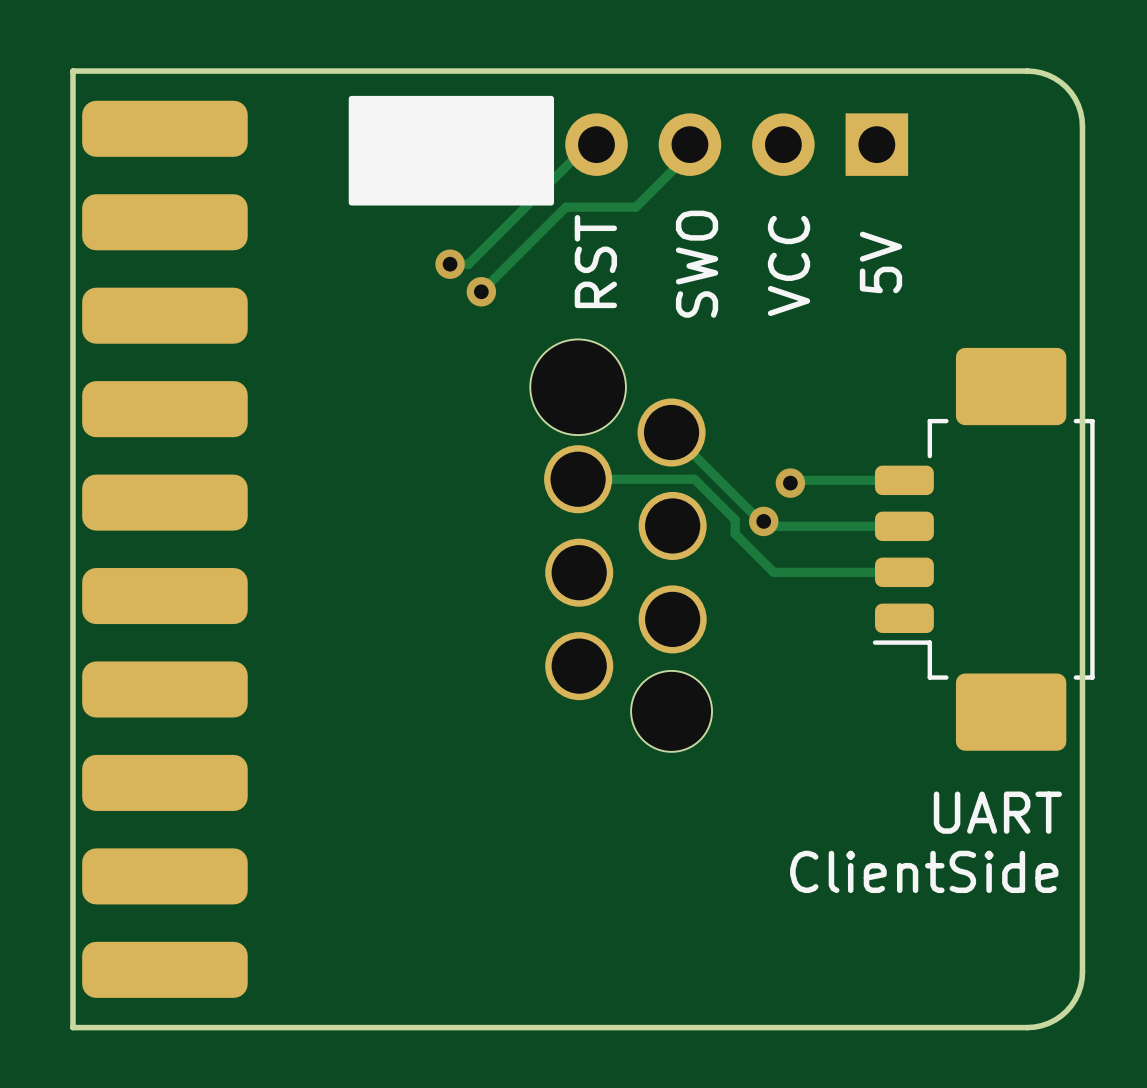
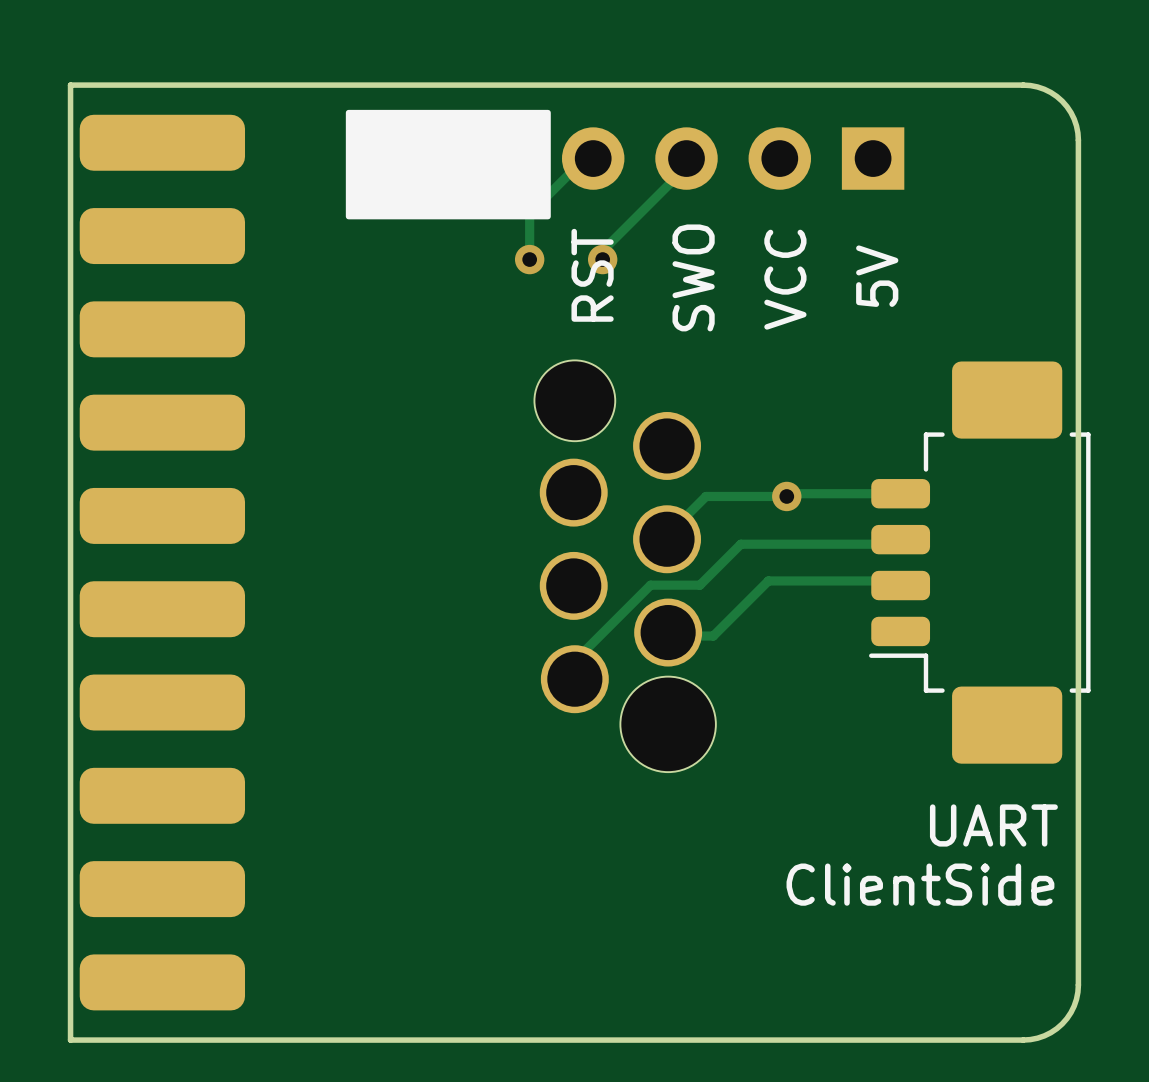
track: (532, 199) (468, 264) (450, 264) -> (529, 213) (529, 259)
track: (635, 207) (565, 207) (481, 291) -> (632, 220) (602, 250) (602, 259)
via: none -> (529, 259)
via: none -> (602, 259)
via: (450, 264) -> none
via: (481, 291) -> none
track: (671, 432) (765, 526) (904, 526) -> none
track: (578, 479) (694, 479) (735, 519) (735, 533) (773, 572) (904, 572) -> (658, 636) (713, 636) (768, 580) (896, 580) (900, 585)
track: none -> (786, 496) (705, 496) (658, 544)
via: (763, 521) -> none
track: none -> (915, 544) (740, 544) (699, 585) (650, 585) (574, 660) (574, 679)
part rotation: 0° (621, 545) -> 180° (625, 566)

